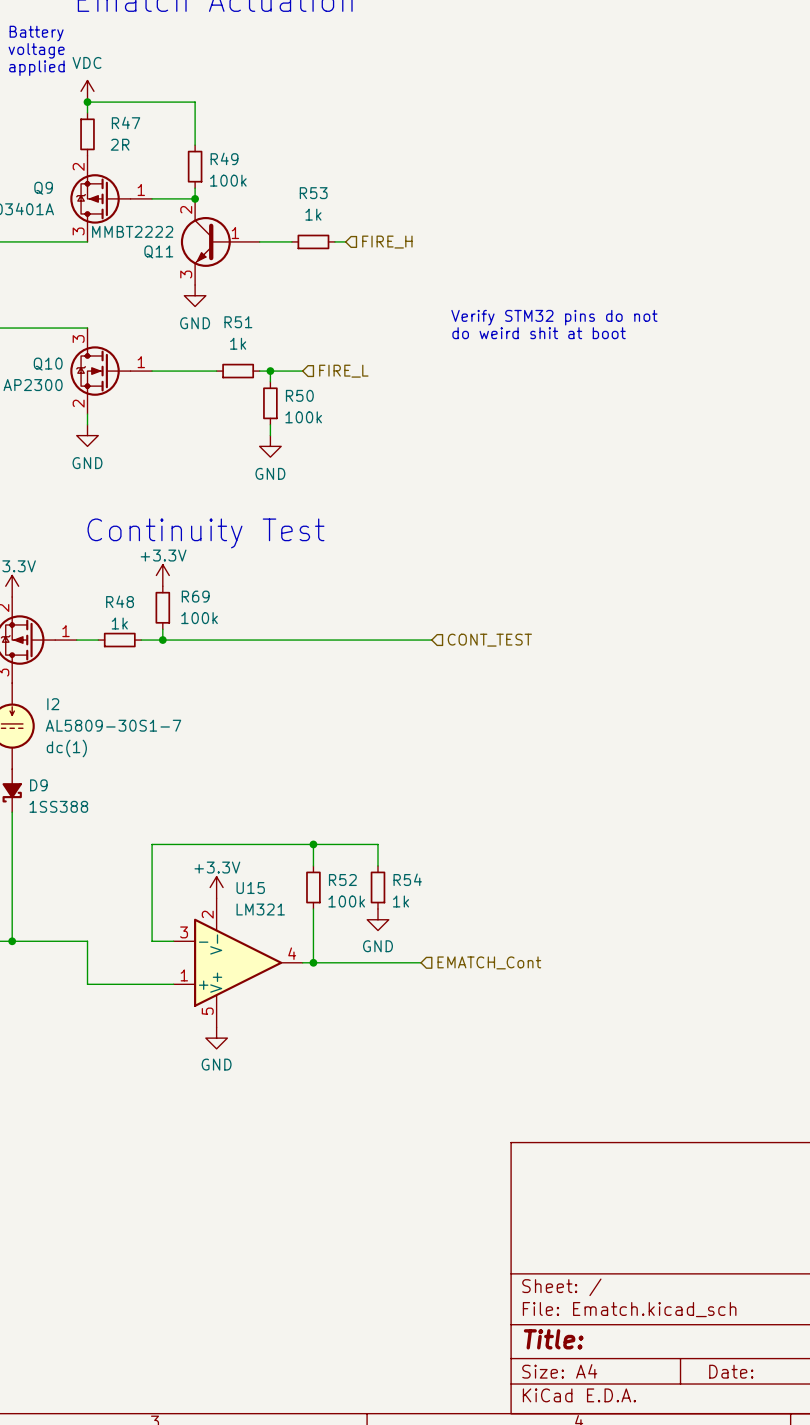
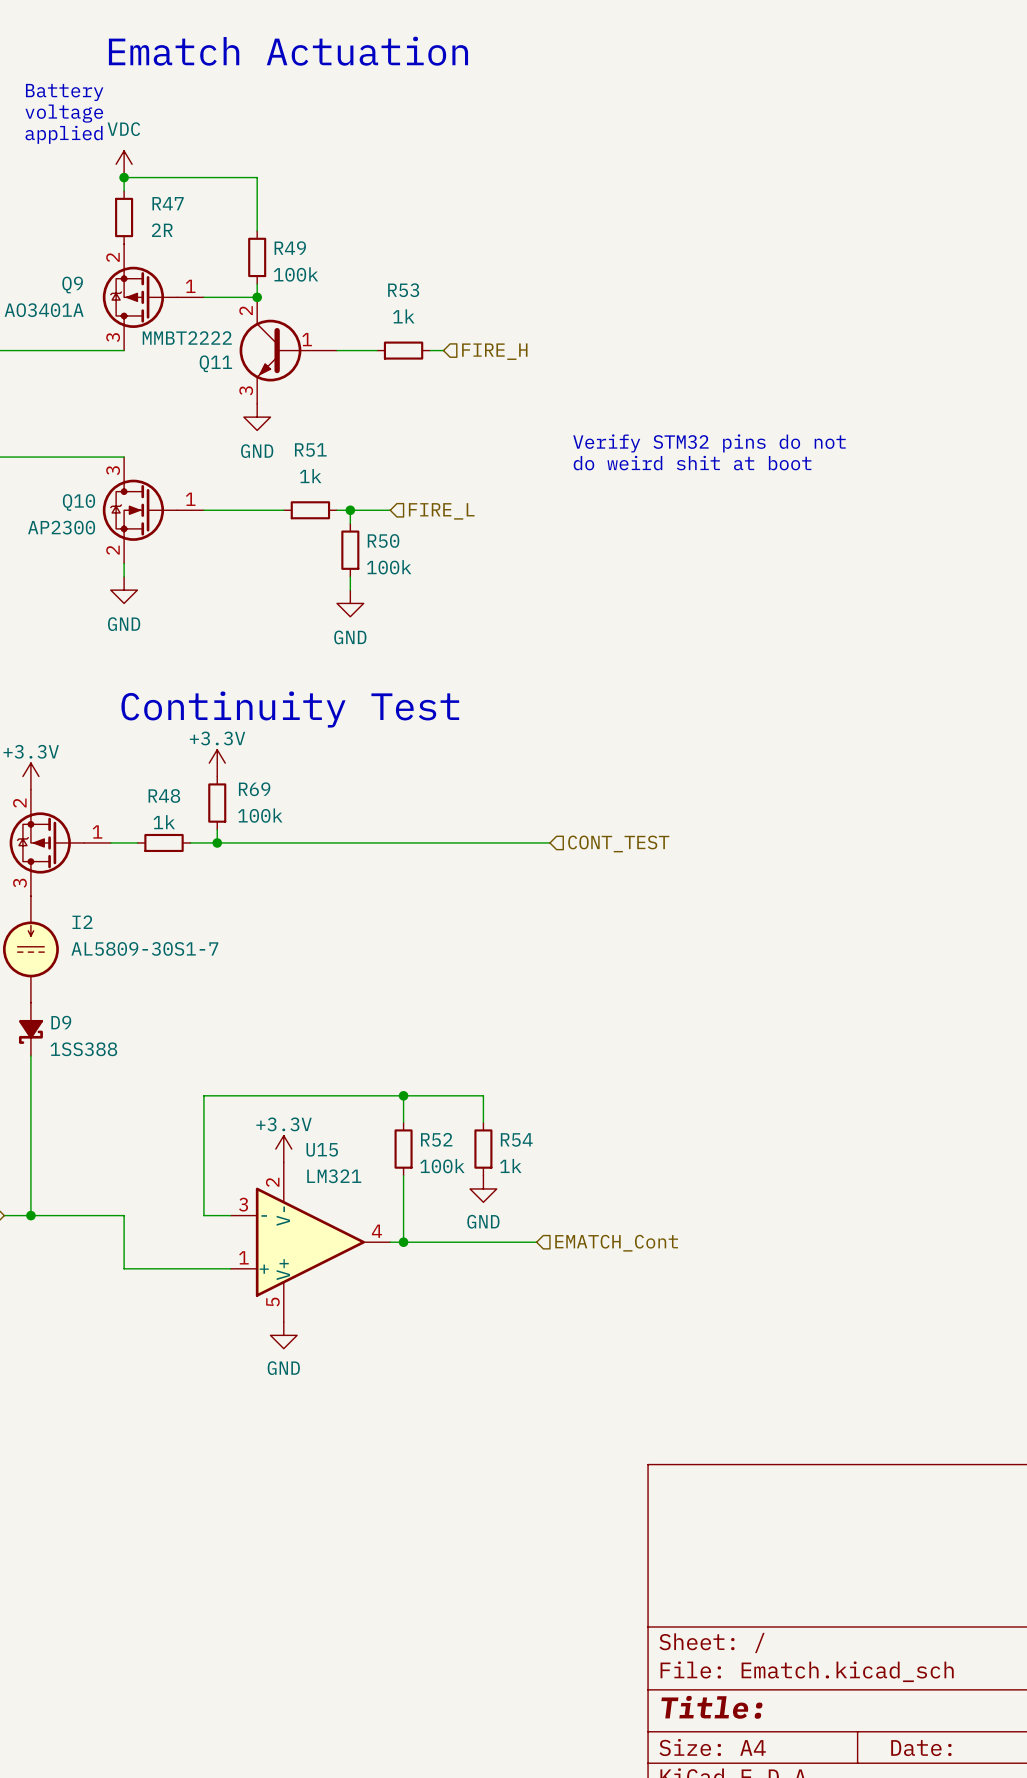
I2 text: dc(1) (66, 748) -> none

